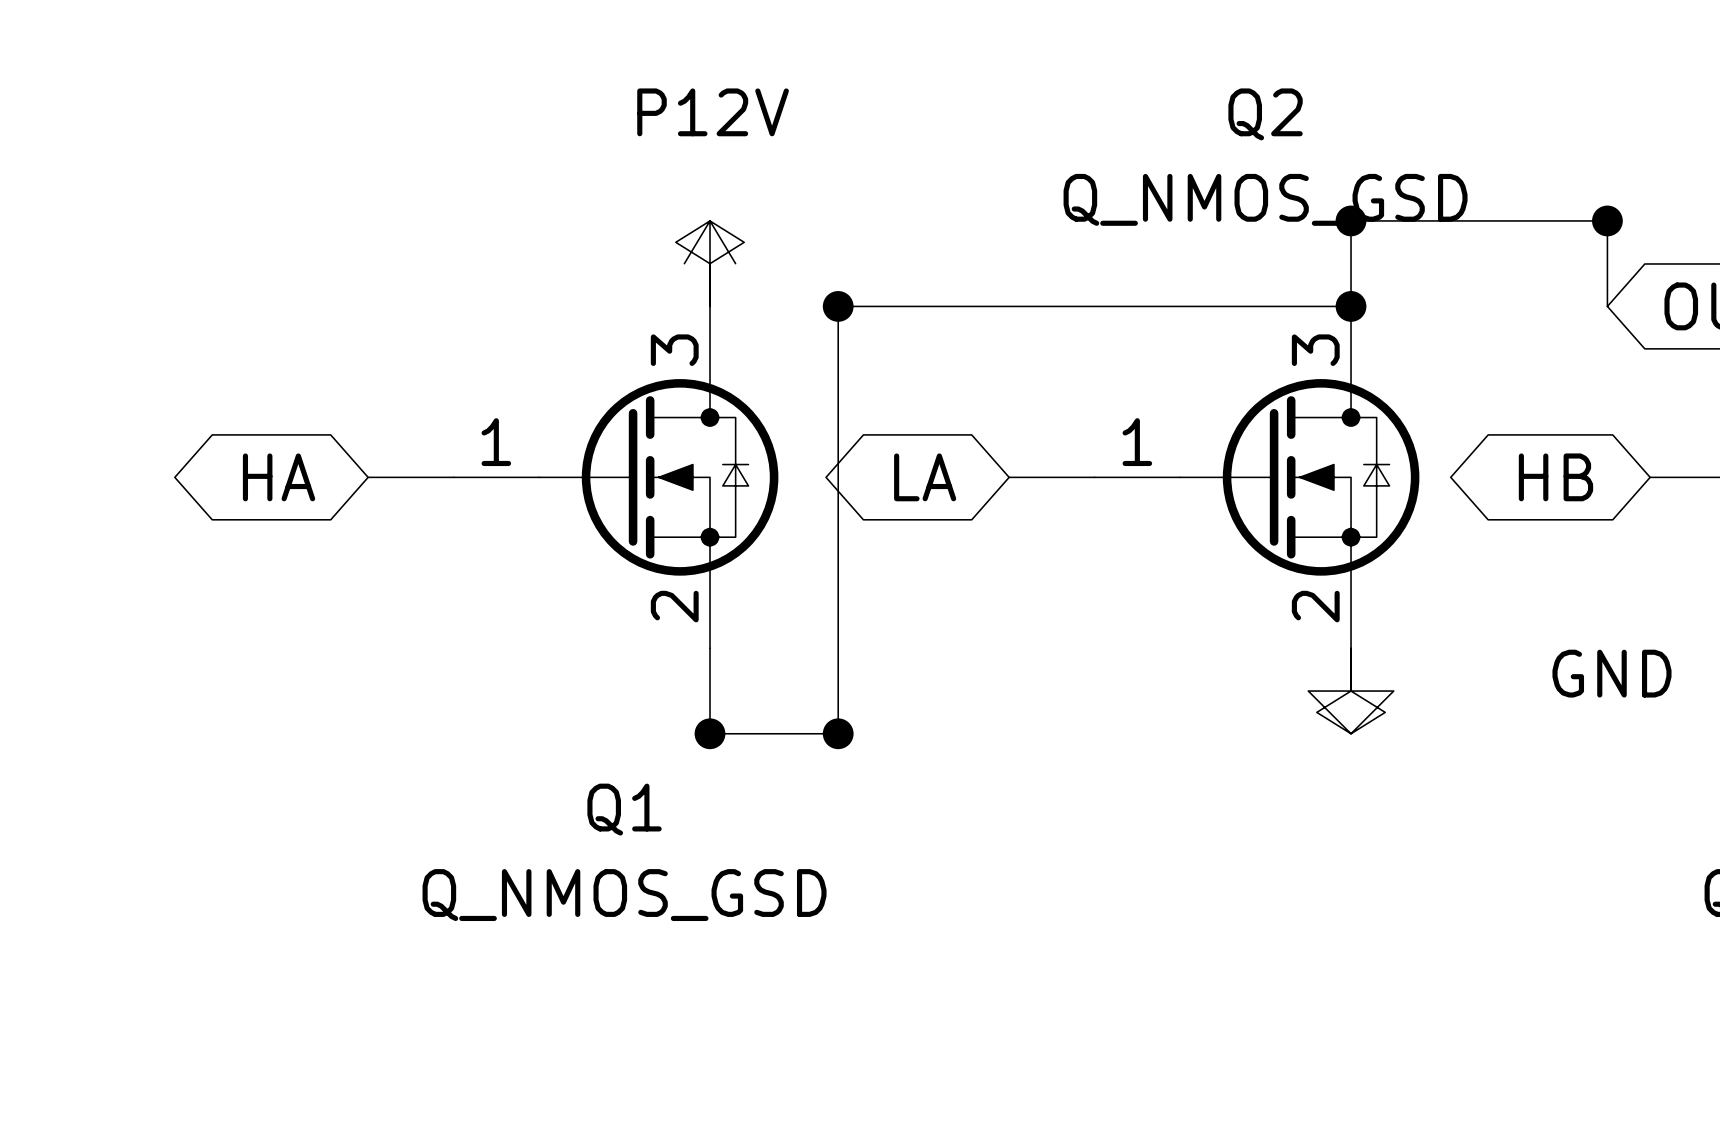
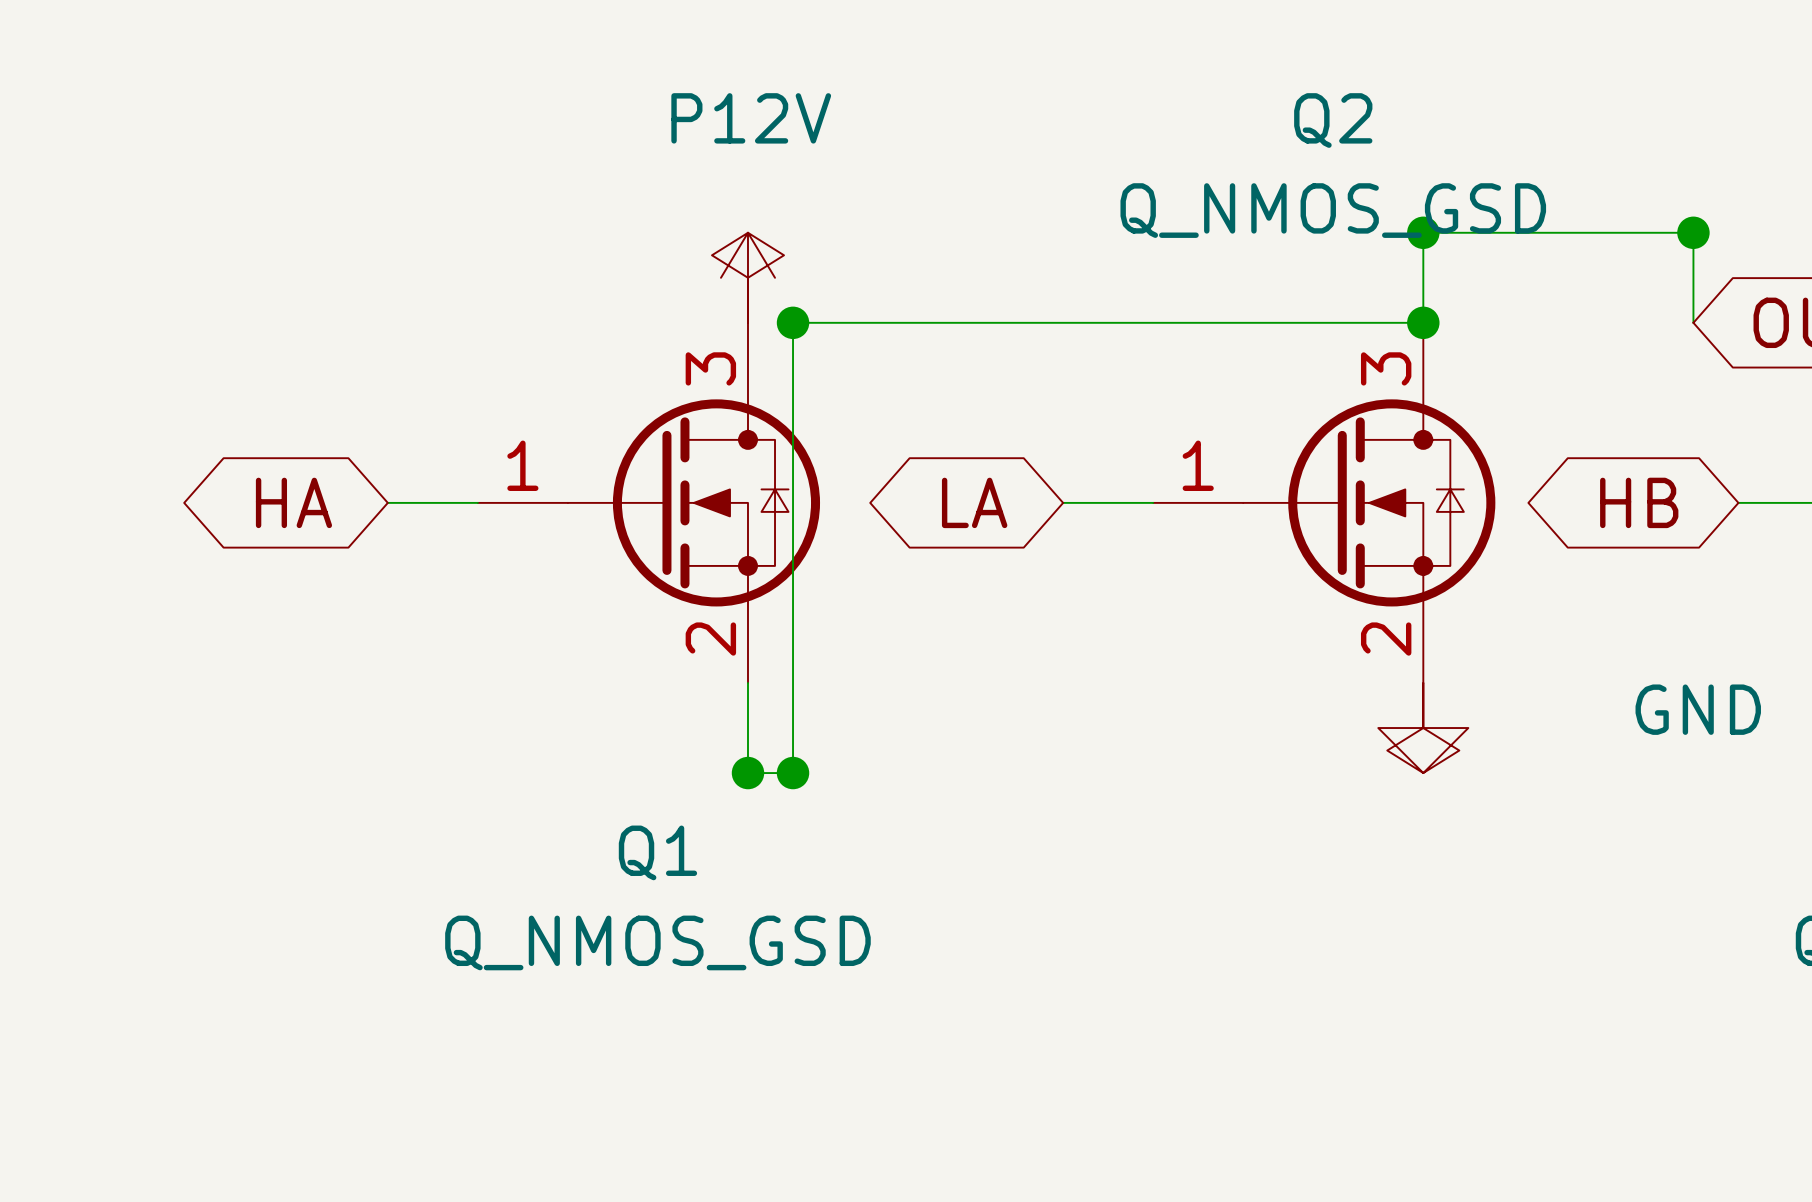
wire: (838, 306) (838, 733) (752, 733) -> (883, 322) (793, 322) (793, 773)
junction position: (838, 306) -> (793, 322)
junction position: (838, 733) -> (793, 773)

